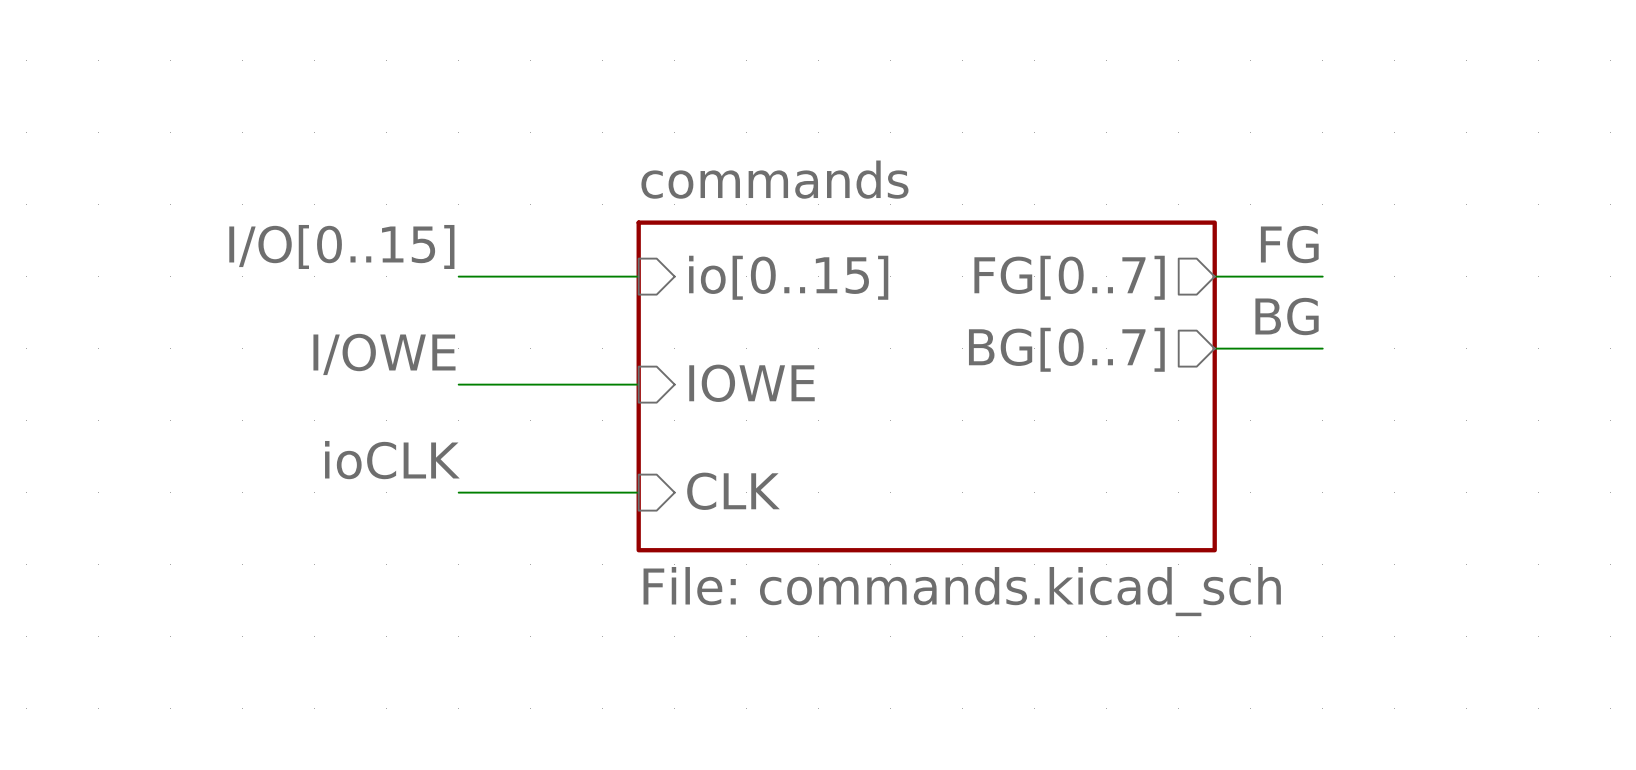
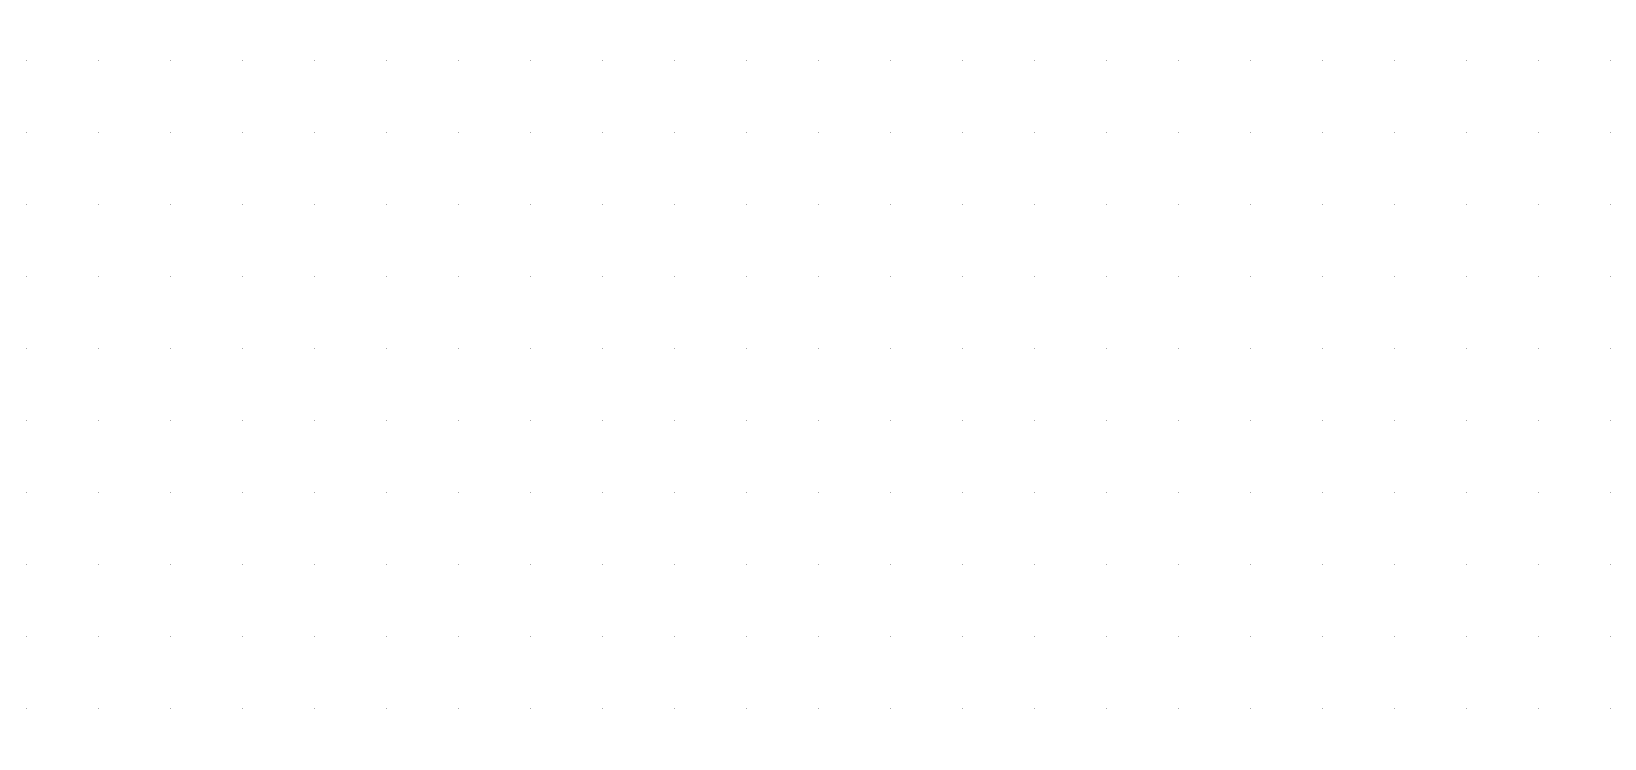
label: FG (1289, 244) -> none
label: I/O[0..15] (341, 246) -> none
wire: (458, 276) (638, 276) -> none
wire: (1214, 276) (1322, 276) -> none
sheet pin: io[0..15] (788, 277) -> none
sheet pin: FG[0..7] (1069, 277) -> none
label: BG (1287, 316) -> none
wire: (1214, 348) (1322, 348) -> none
sheet pin: BG[0..7] (1066, 349) -> none
label: I/OWE (384, 354) -> none
sheet pin: IOWE (751, 383) -> none
wire: (458, 384) (638, 384) -> none
sheet commands: File: commands.kicad_sch (926, 386) -> none
label: ioCLK (392, 460) -> none
sheet pin: CLK (733, 491) -> none
wire: (458, 492) (638, 492) -> none

